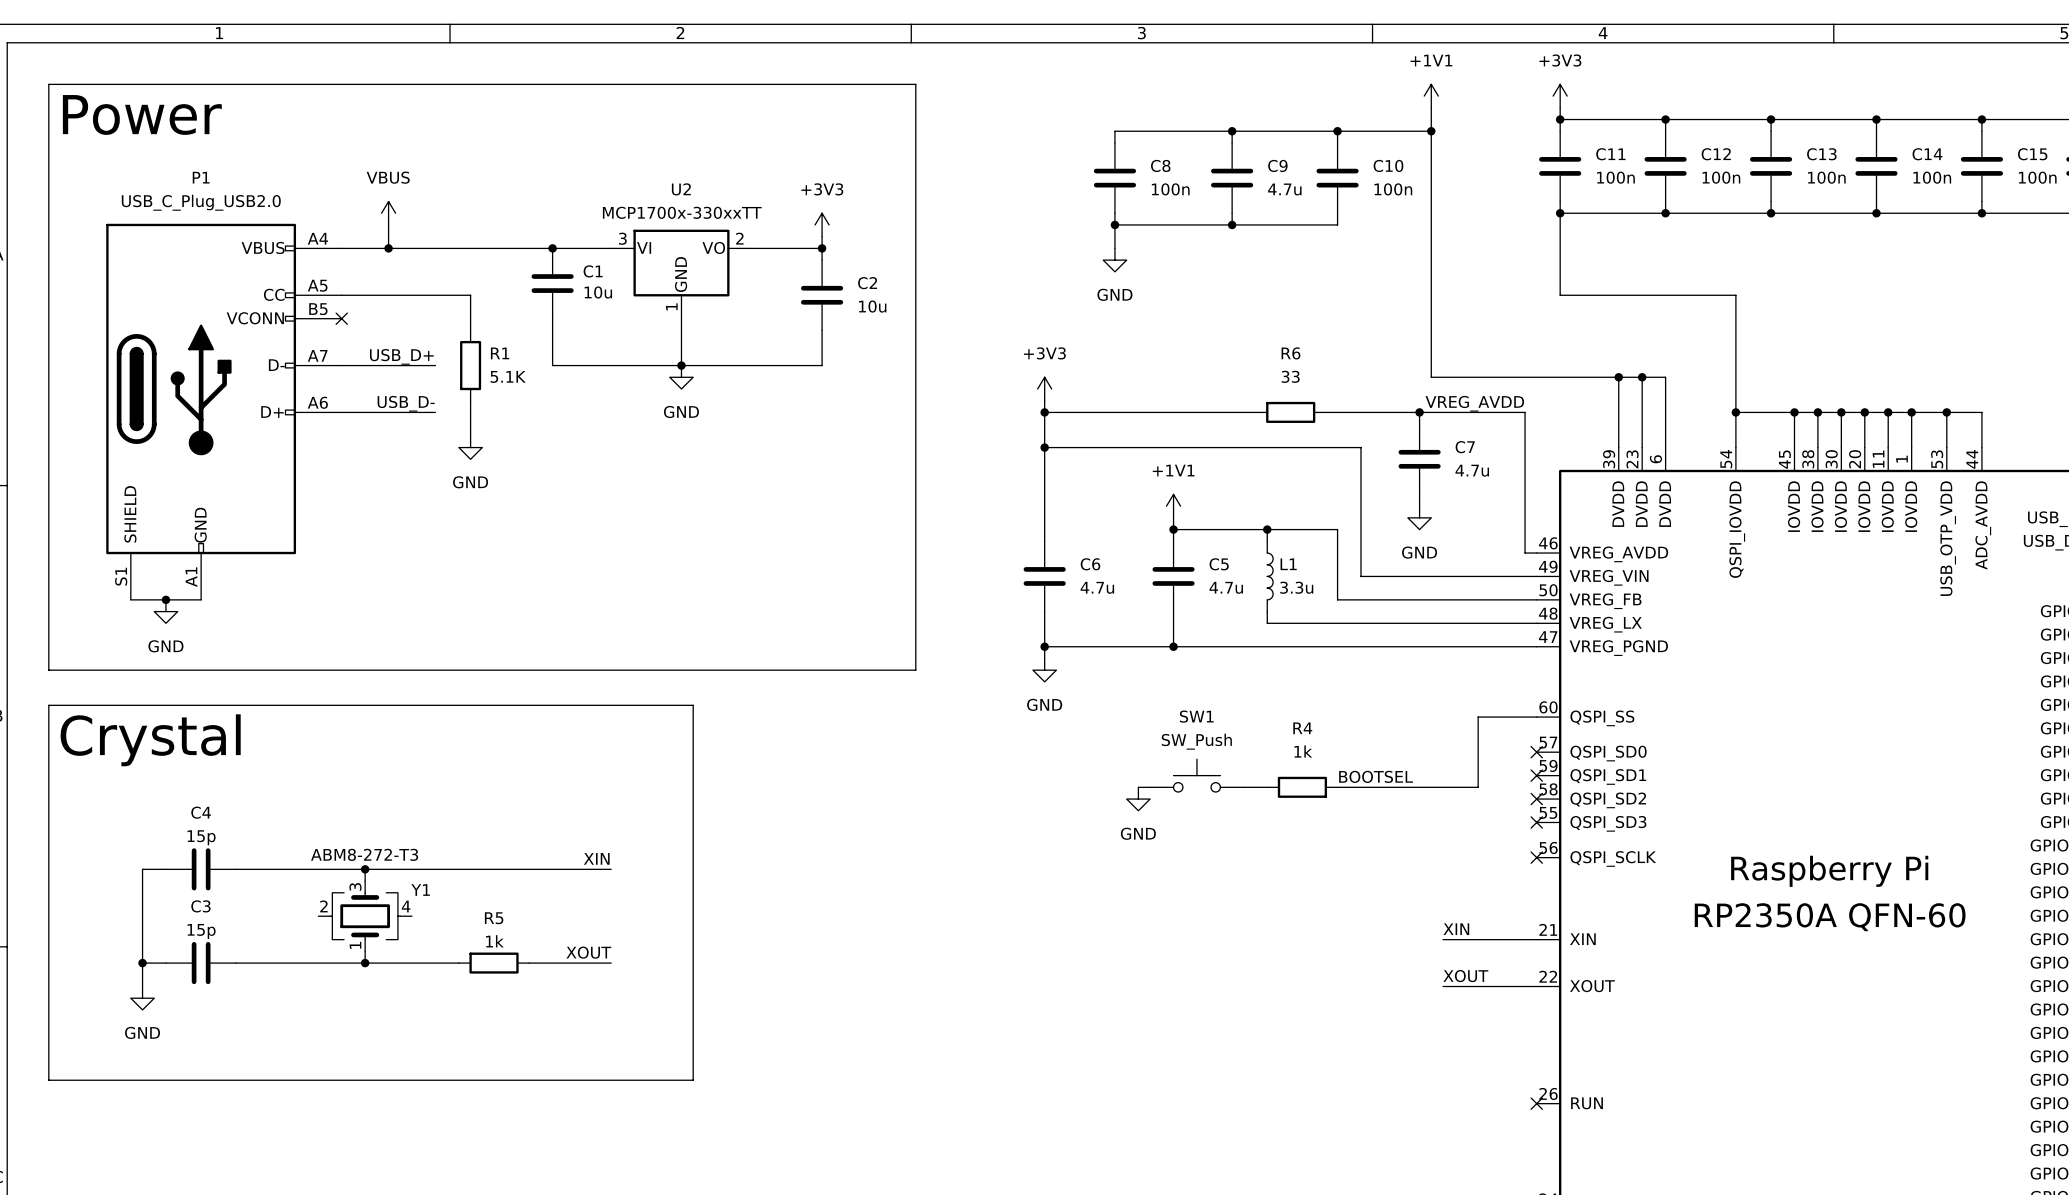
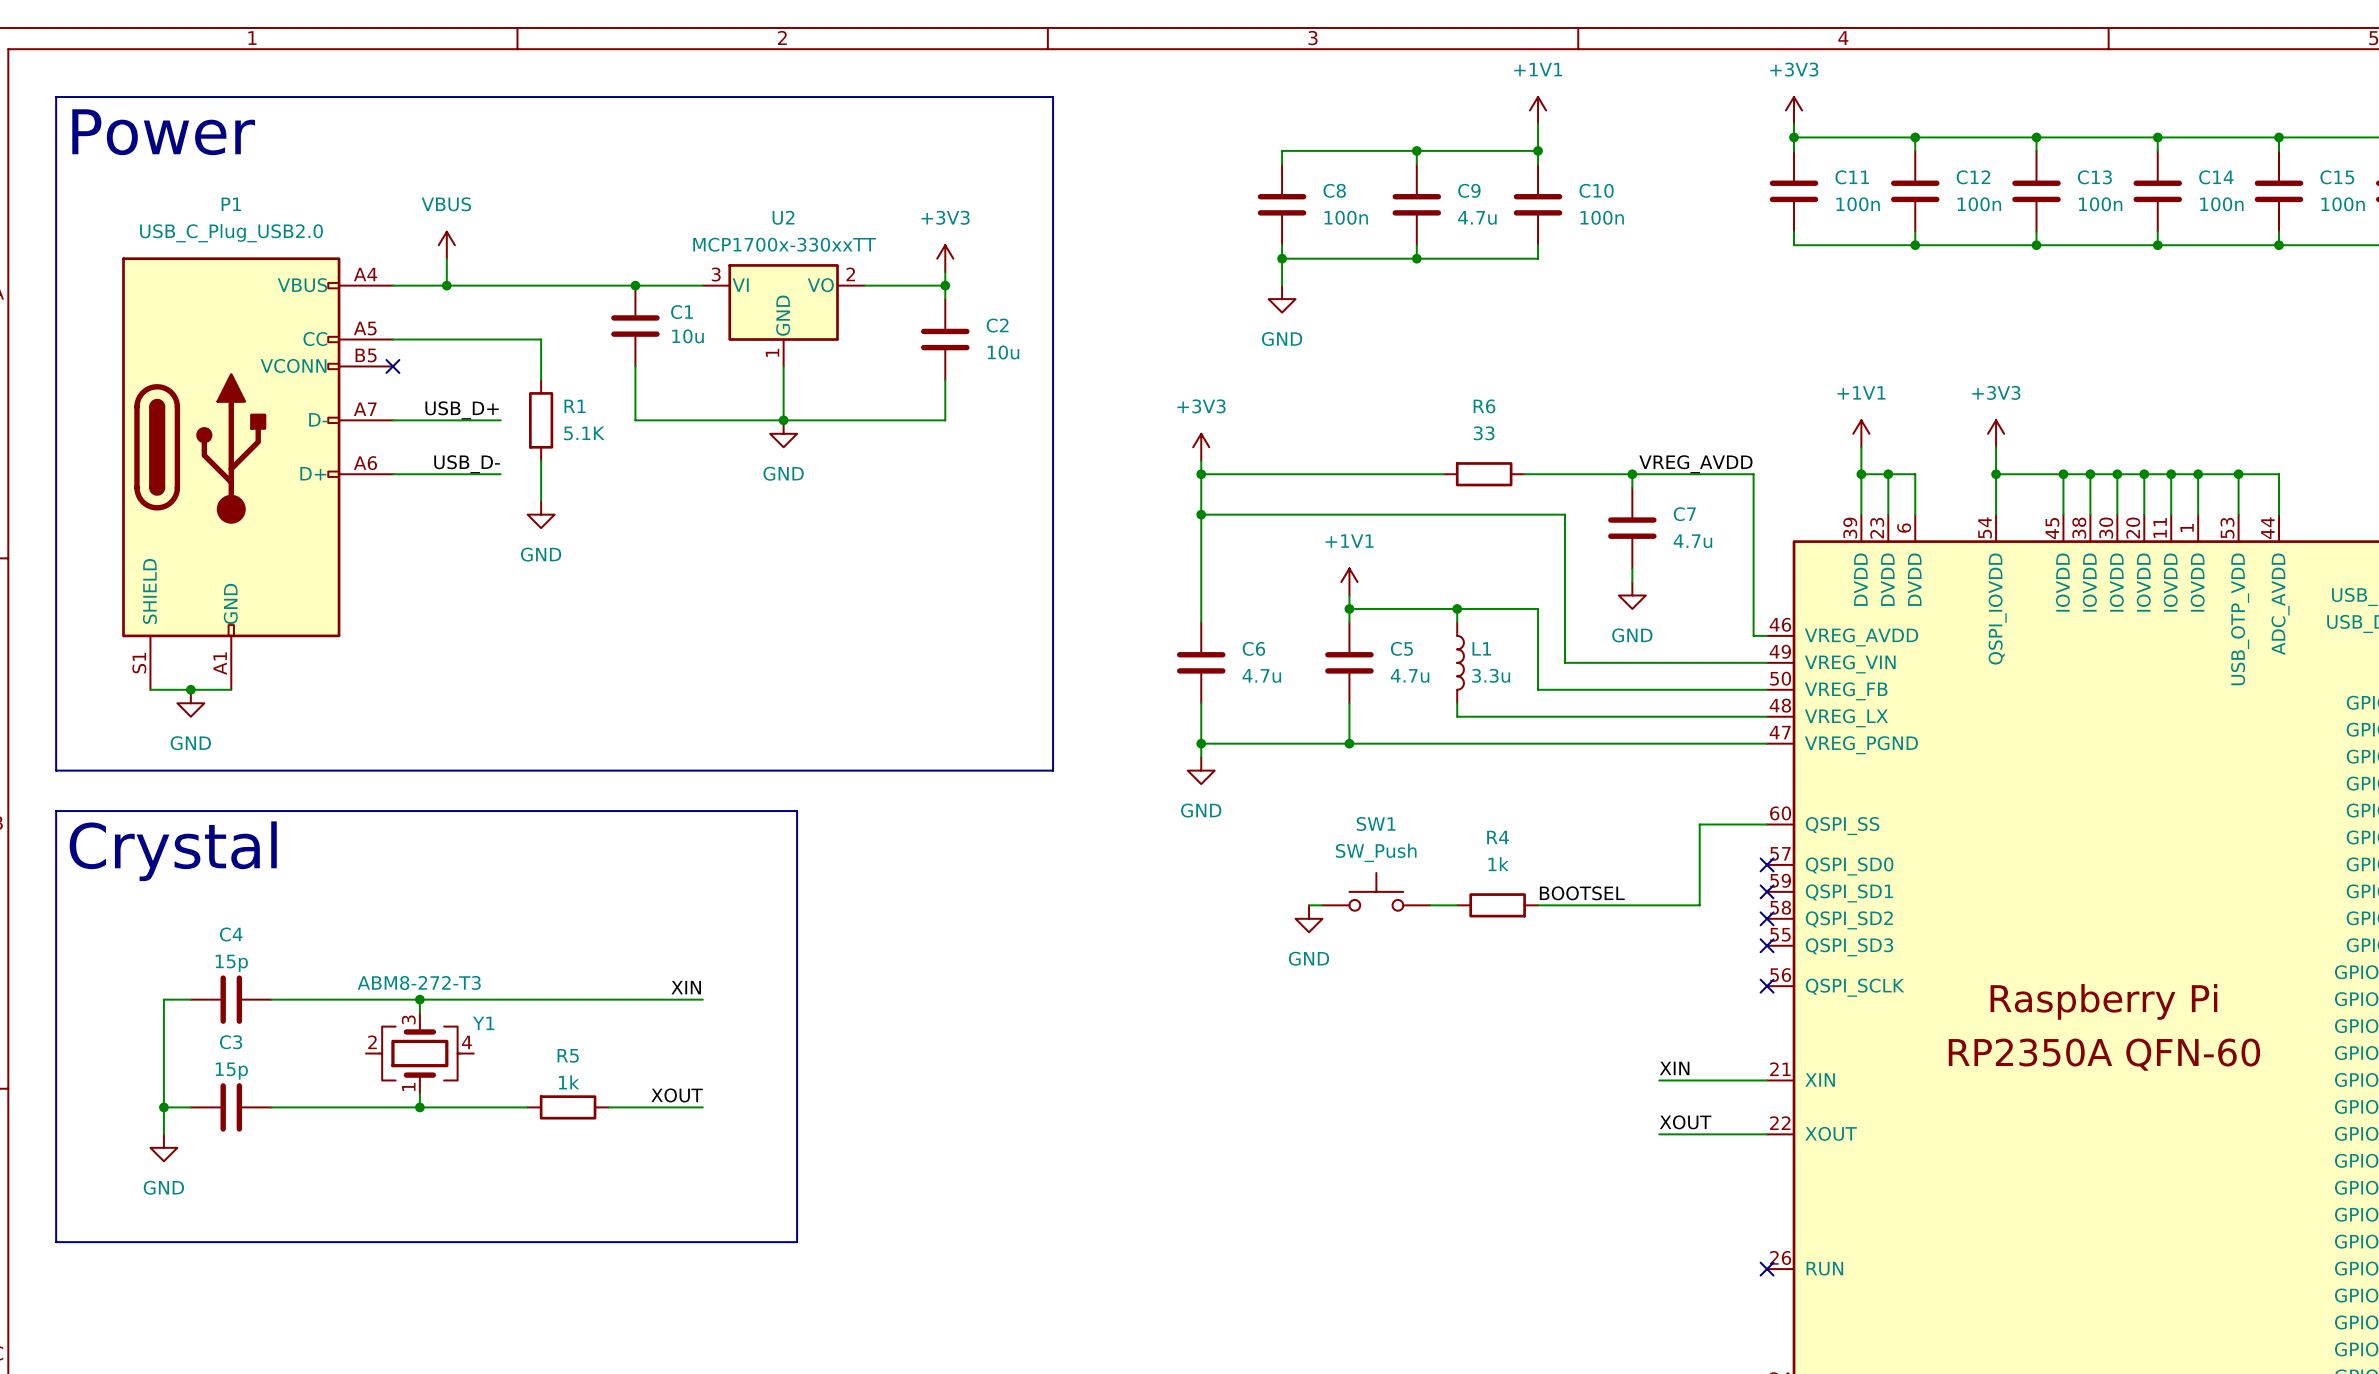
power symbol position: +1V1 (1431, 96) -> +1V1 (1538, 110)
wire: (1431, 107) (1431, 377) (1665, 377) (1665, 412) -> (1861, 474) (1915, 474)
wire: (1337, 131) (1431, 131) -> (1538, 150) (1538, 123)
junction: (1431, 131) -> none
wire: (1560, 213) (1560, 295) (1735, 295) (1735, 388) -> none
junction: (1560, 213) -> none
junction: (1618, 377) -> none
power symbol: none -> +1V1 (1861, 433)
wire: (1642, 377) (1642, 412) -> none
junction: (1642, 377) -> none
power symbol: none -> +3V3 (1996, 433)
junction: none -> (1861, 474)
junction: none -> (1888, 474)

